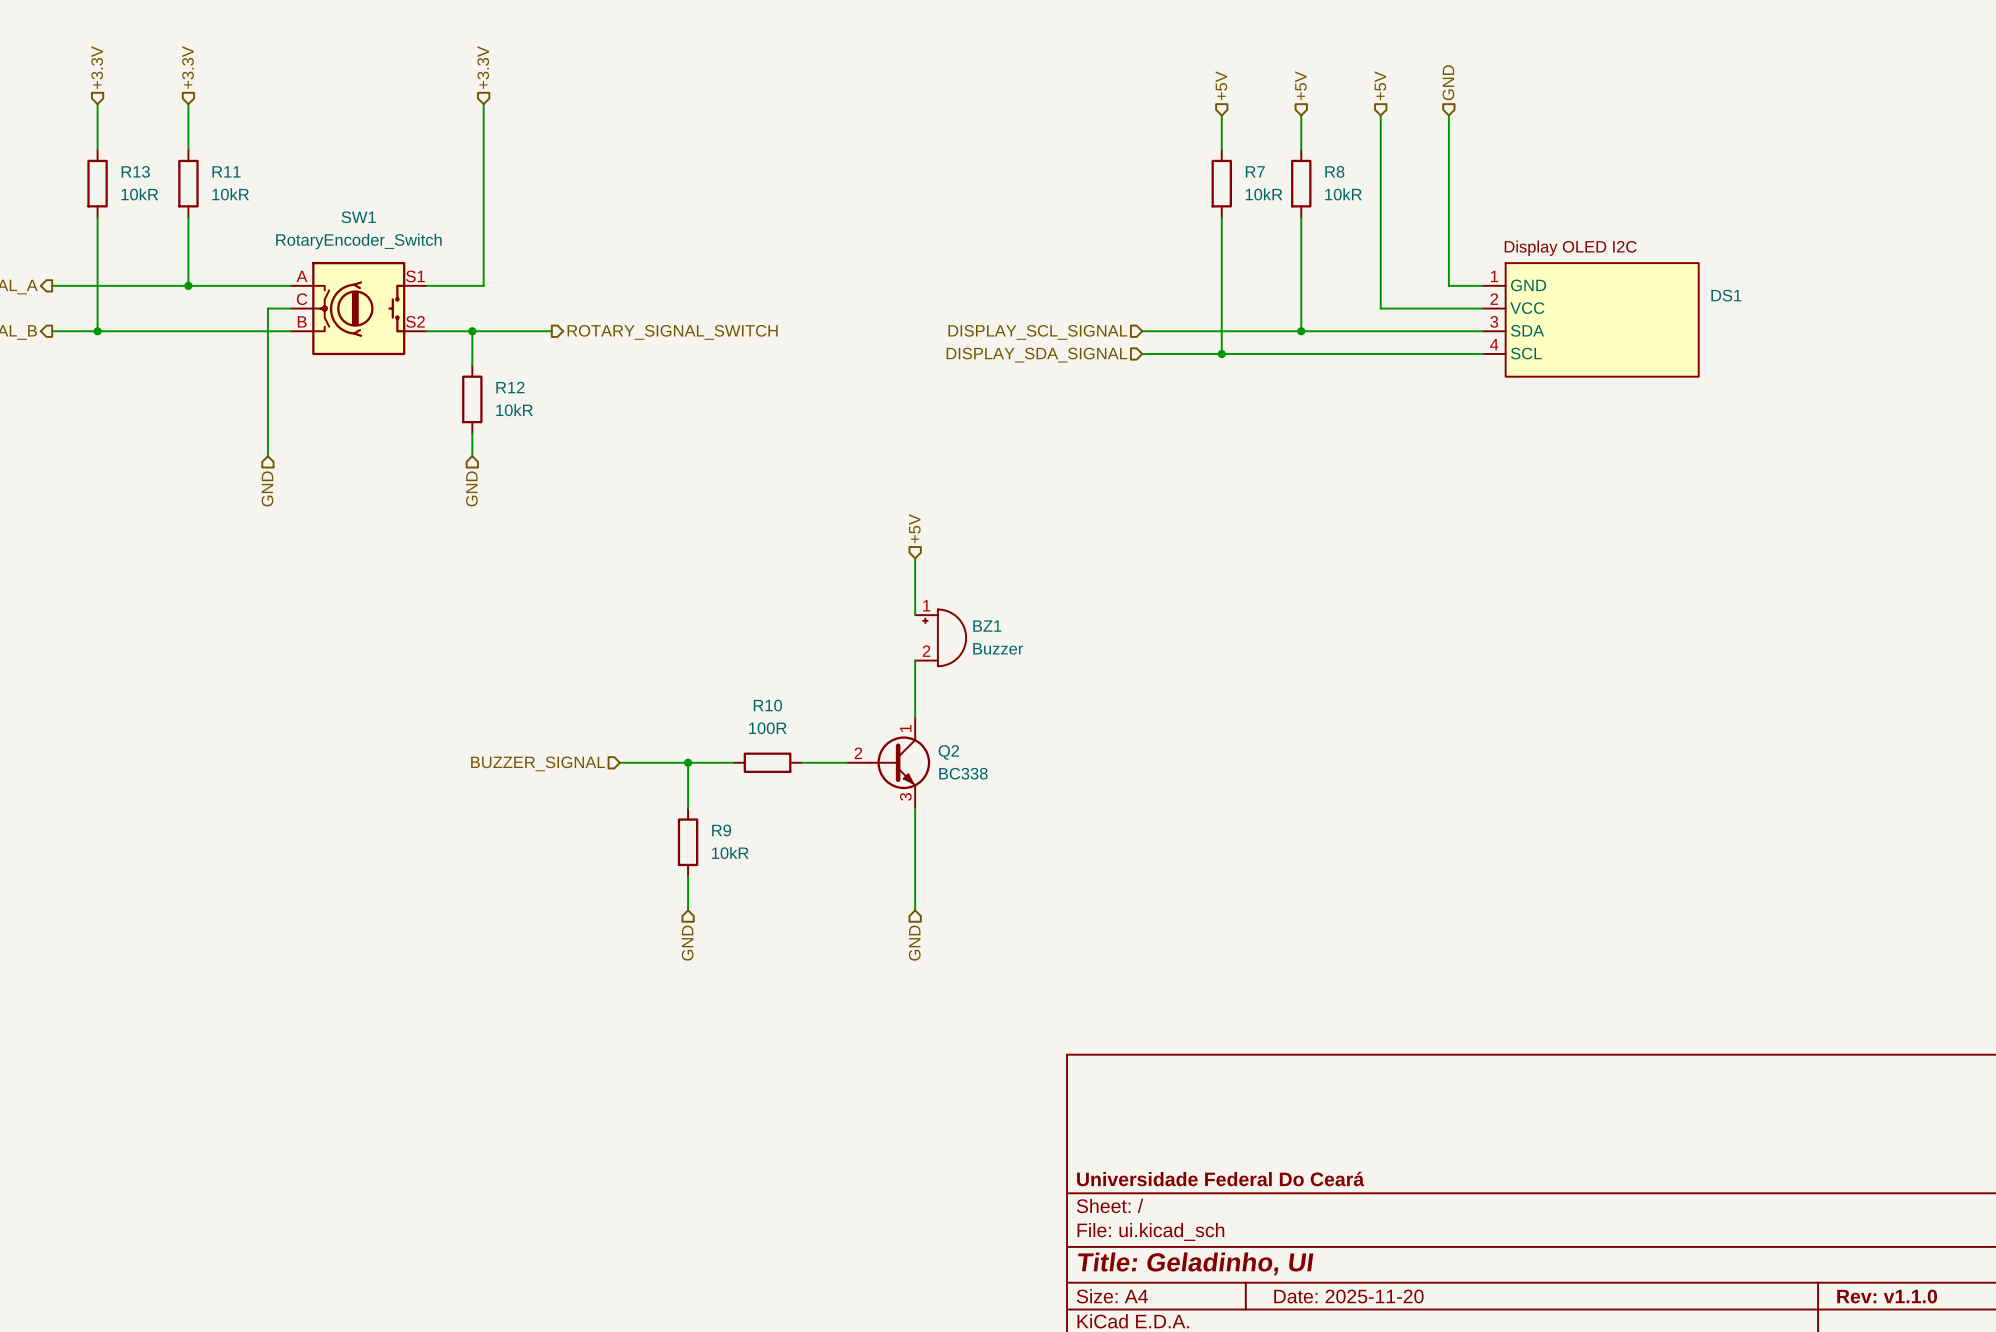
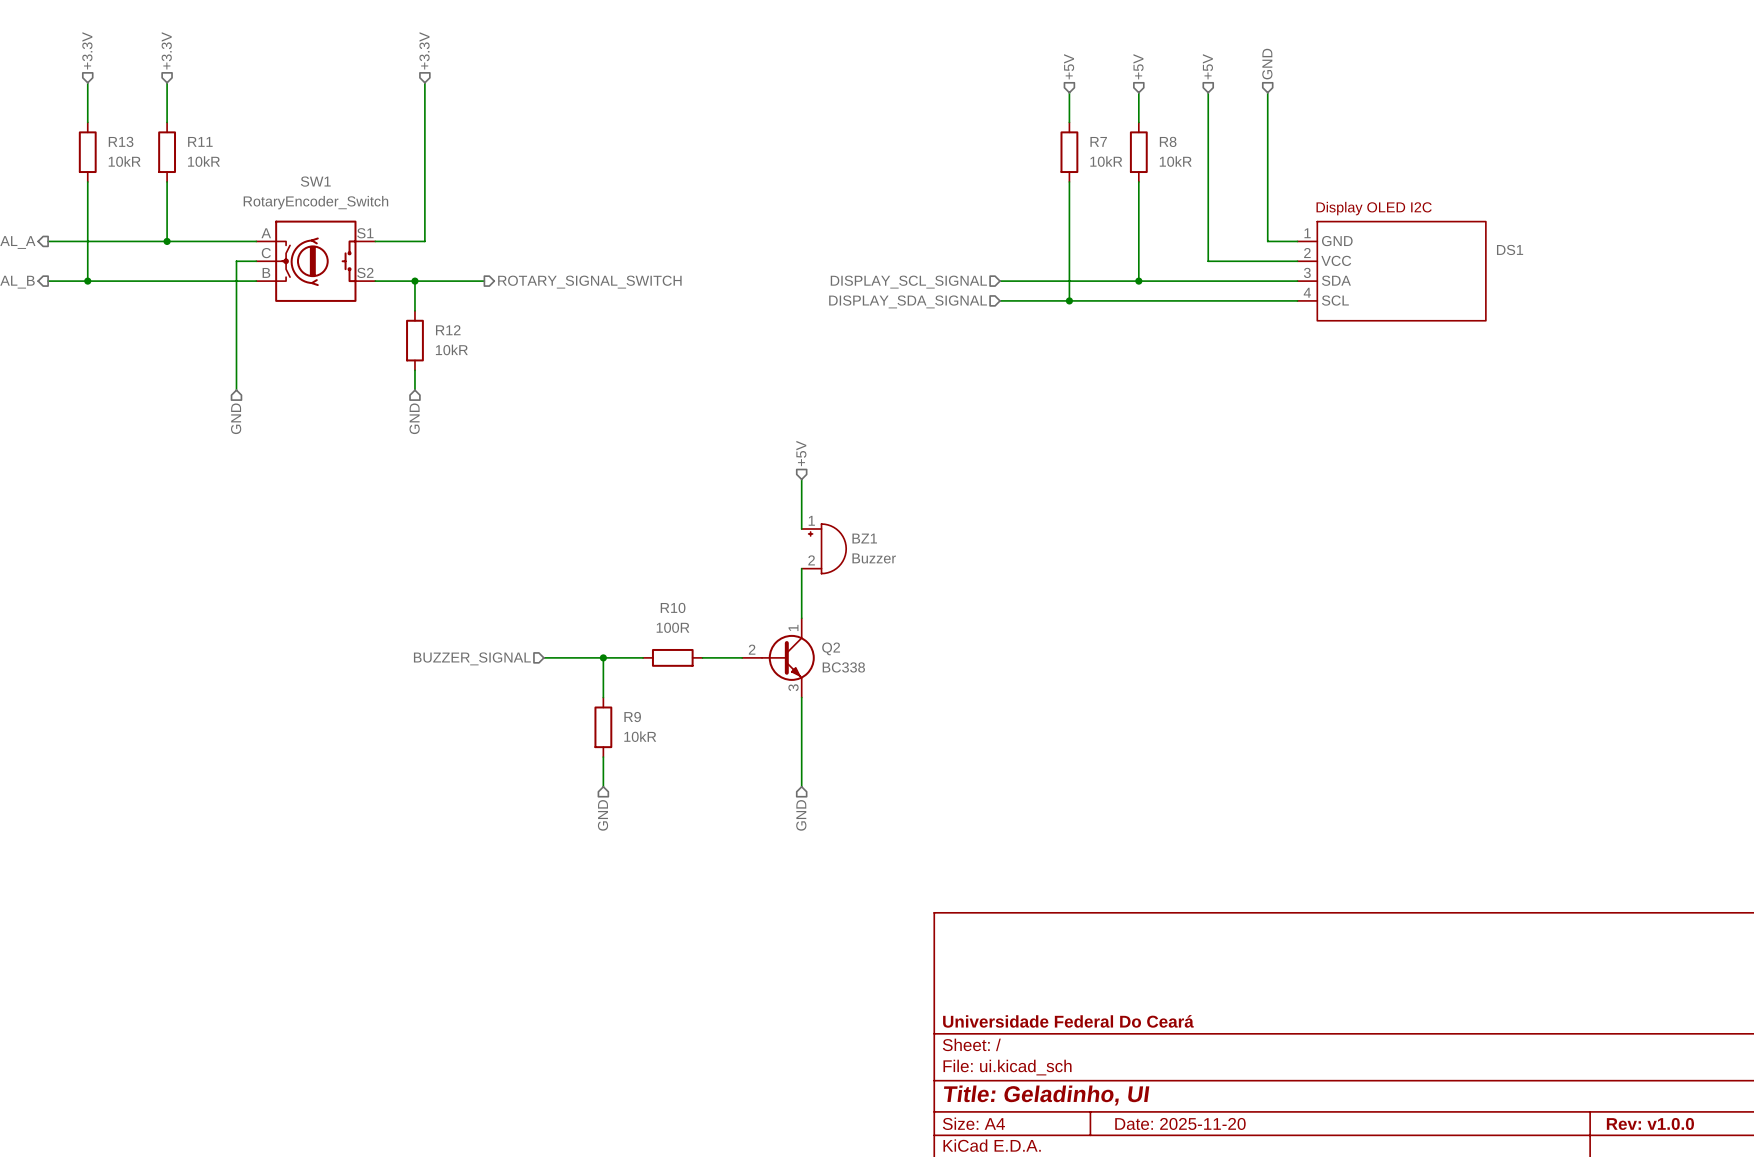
title block: Rev: v1.1.0 (1887, 1296) -> Rev: v1.0.0 (1650, 1123)

